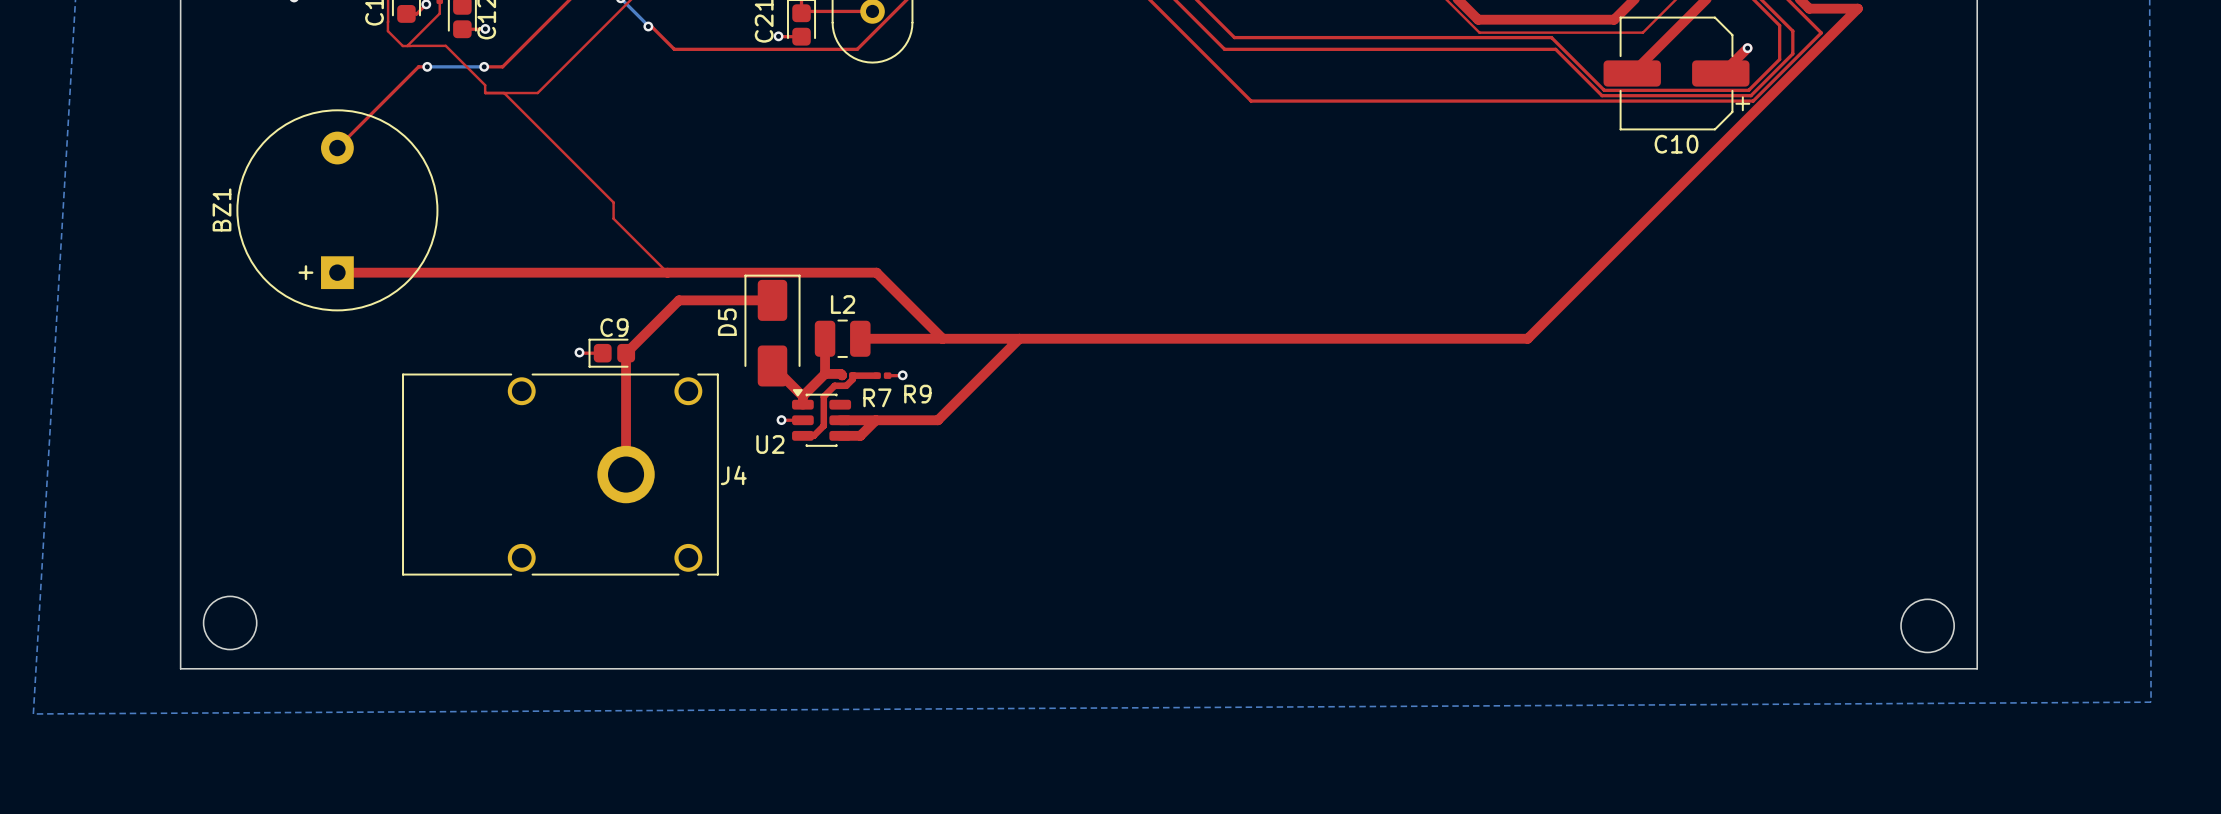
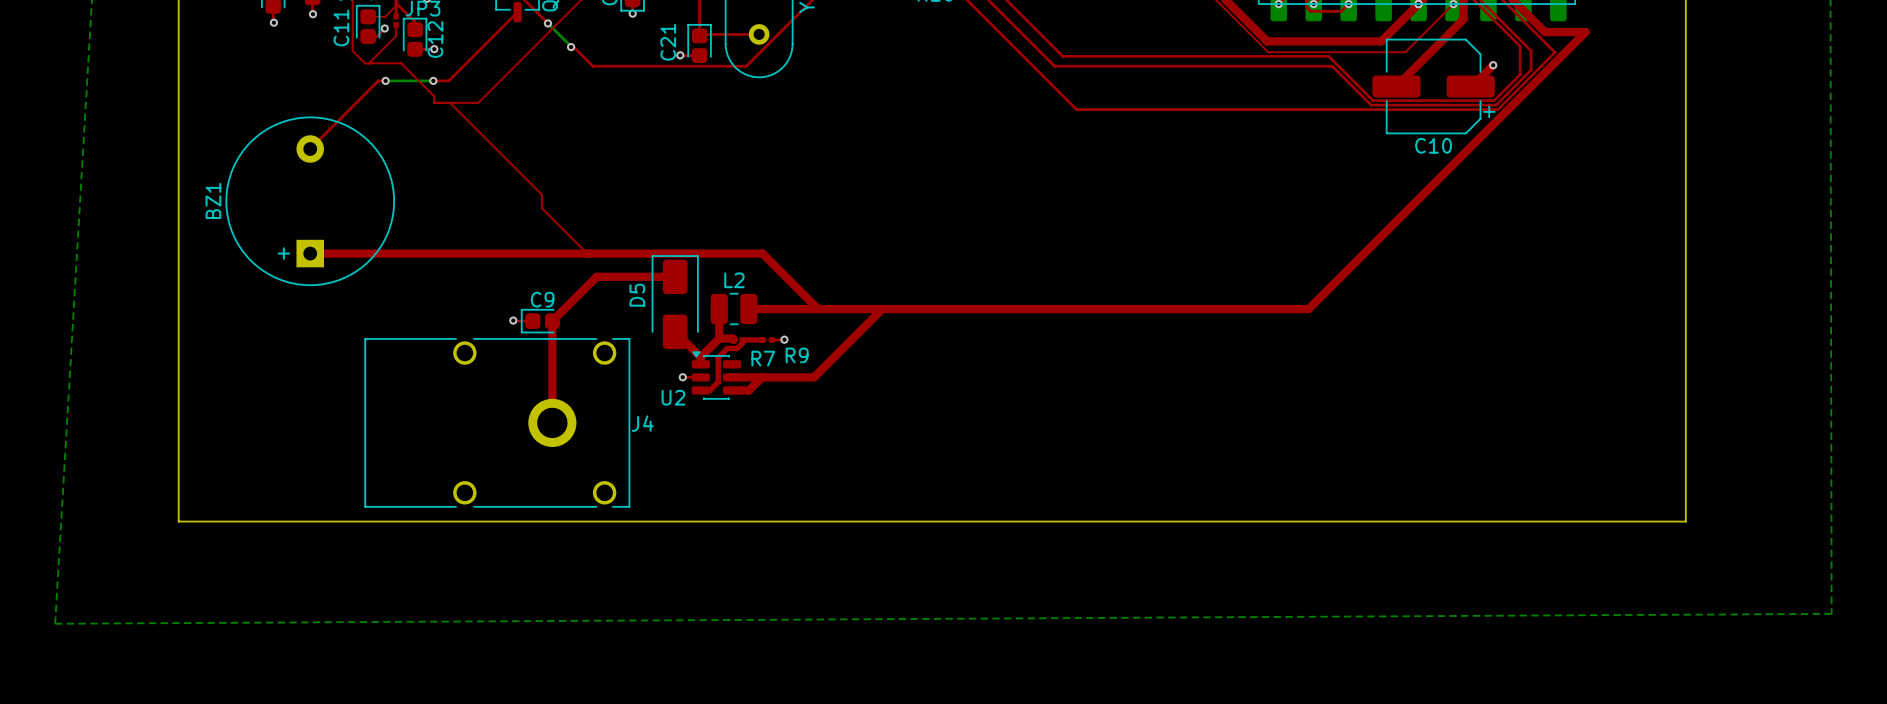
board edge: (180, 592) (180, 668) (1977, 668) (1977, 592) -> (178, 521) (1685, 521)
round board edge: [203, 595, 258, 650] -> none
round board edge: [1900, 598, 1955, 653] -> none

